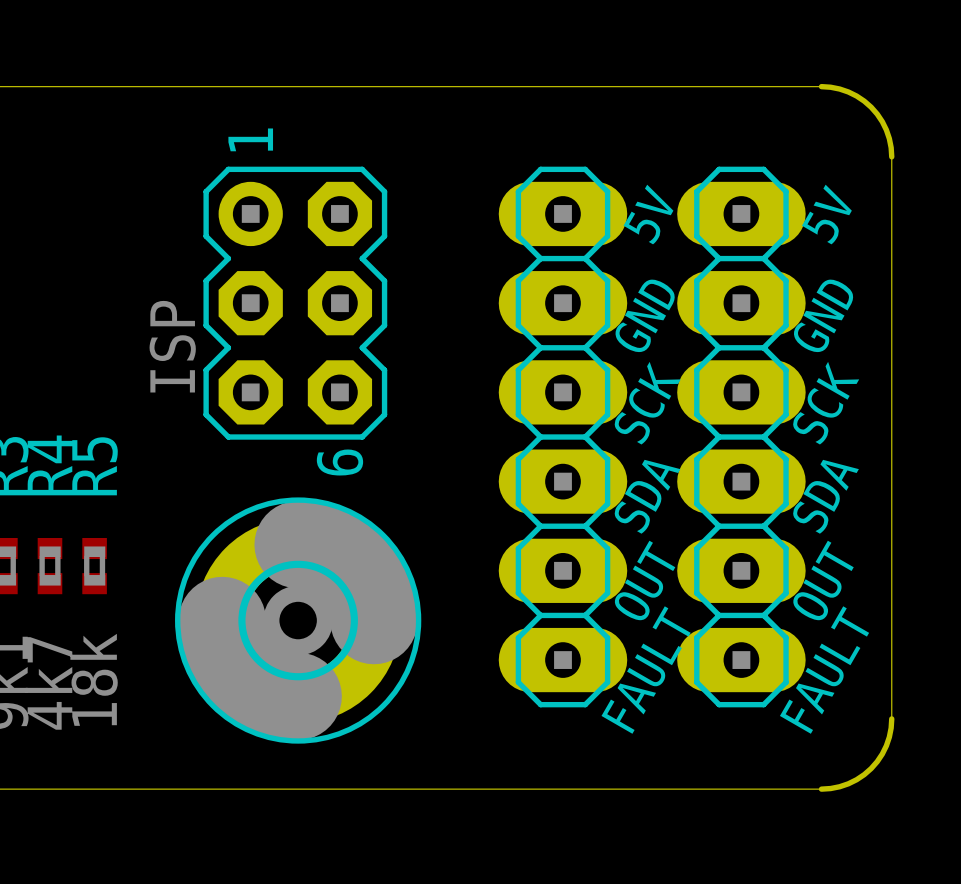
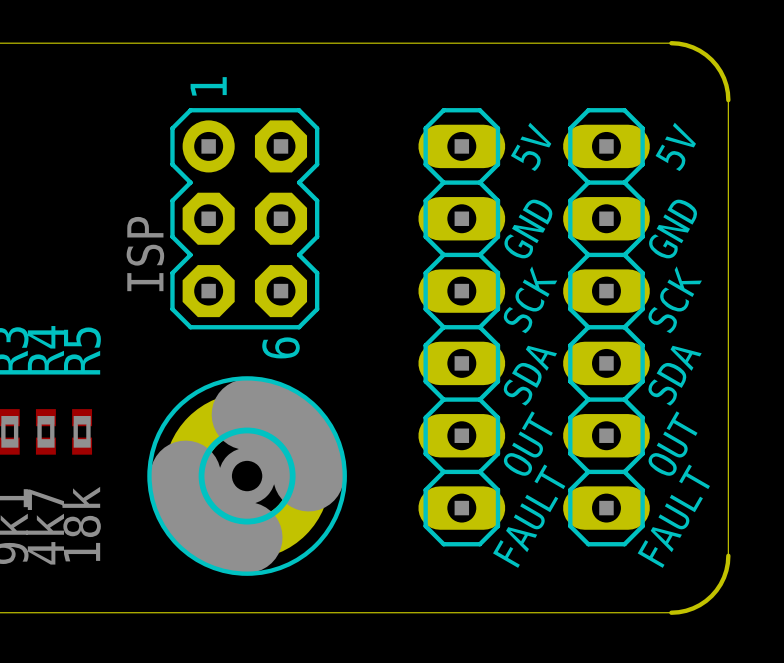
part footprint: [498, 166, 628, 708] -> [418, 108, 506, 547]
part footprint: [677, 166, 806, 708] -> [563, 108, 650, 547]

